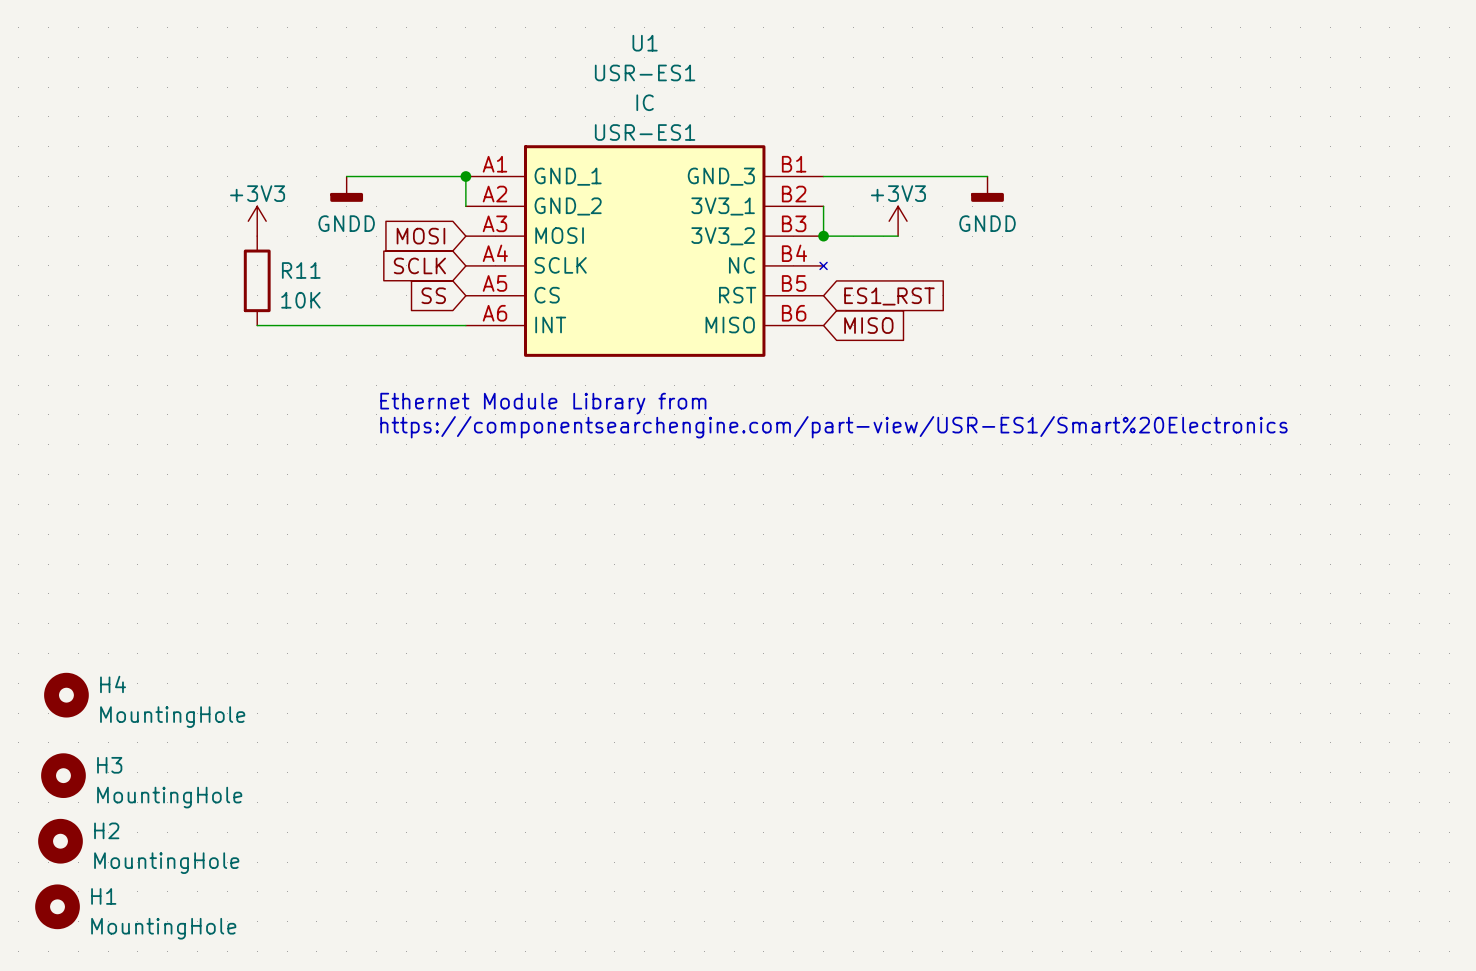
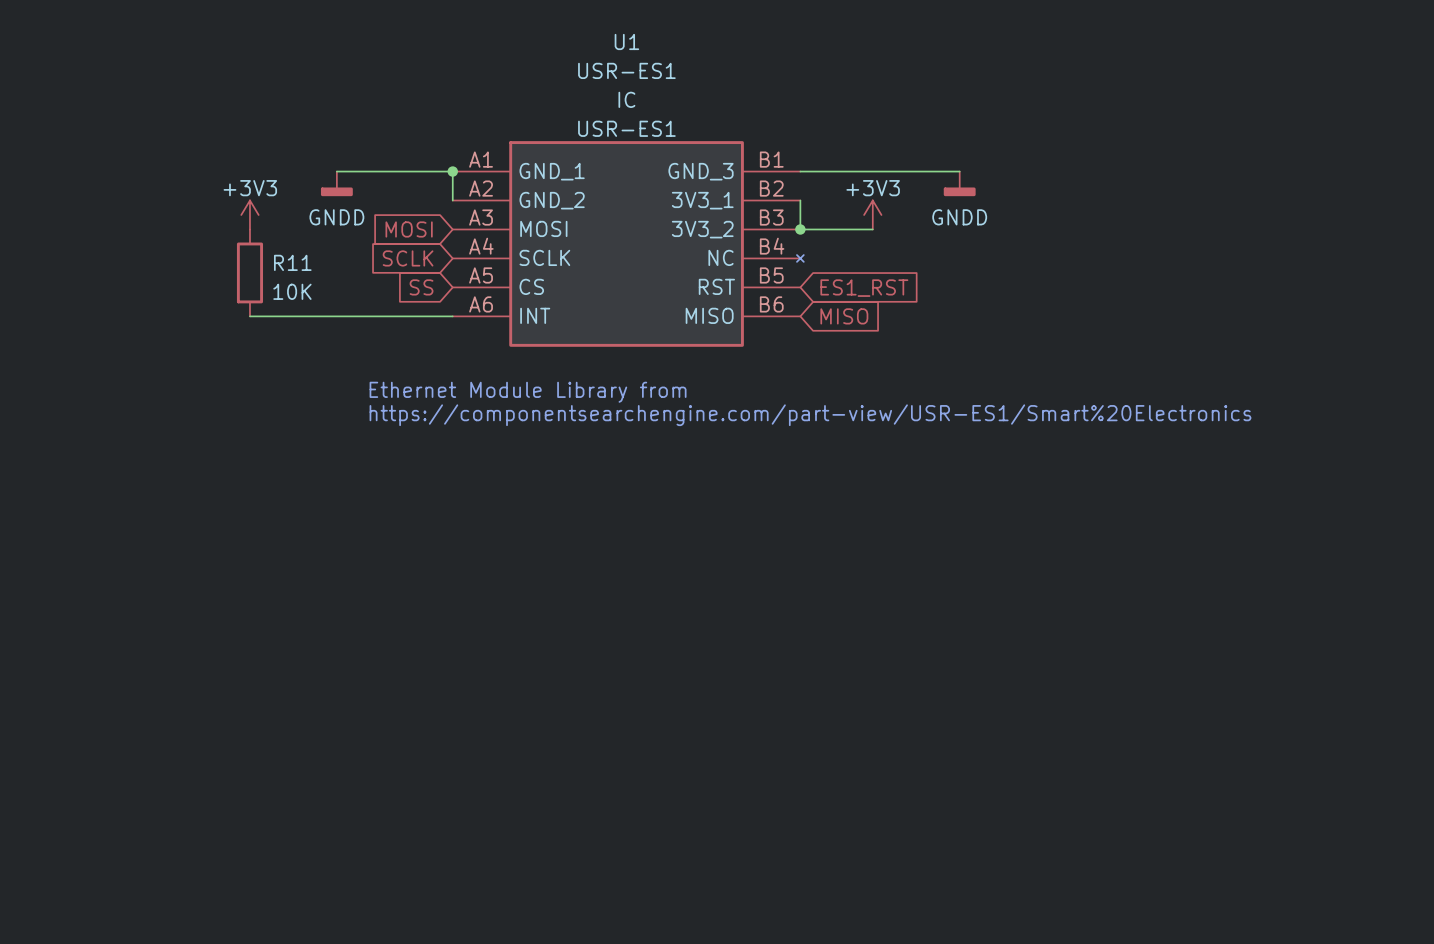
H4: MountingHole (66, 695) -> none
H3: MountingHole (63, 775) -> none
H2: MountingHole (60, 841) -> none
H1: MountingHole (57, 906) -> none

